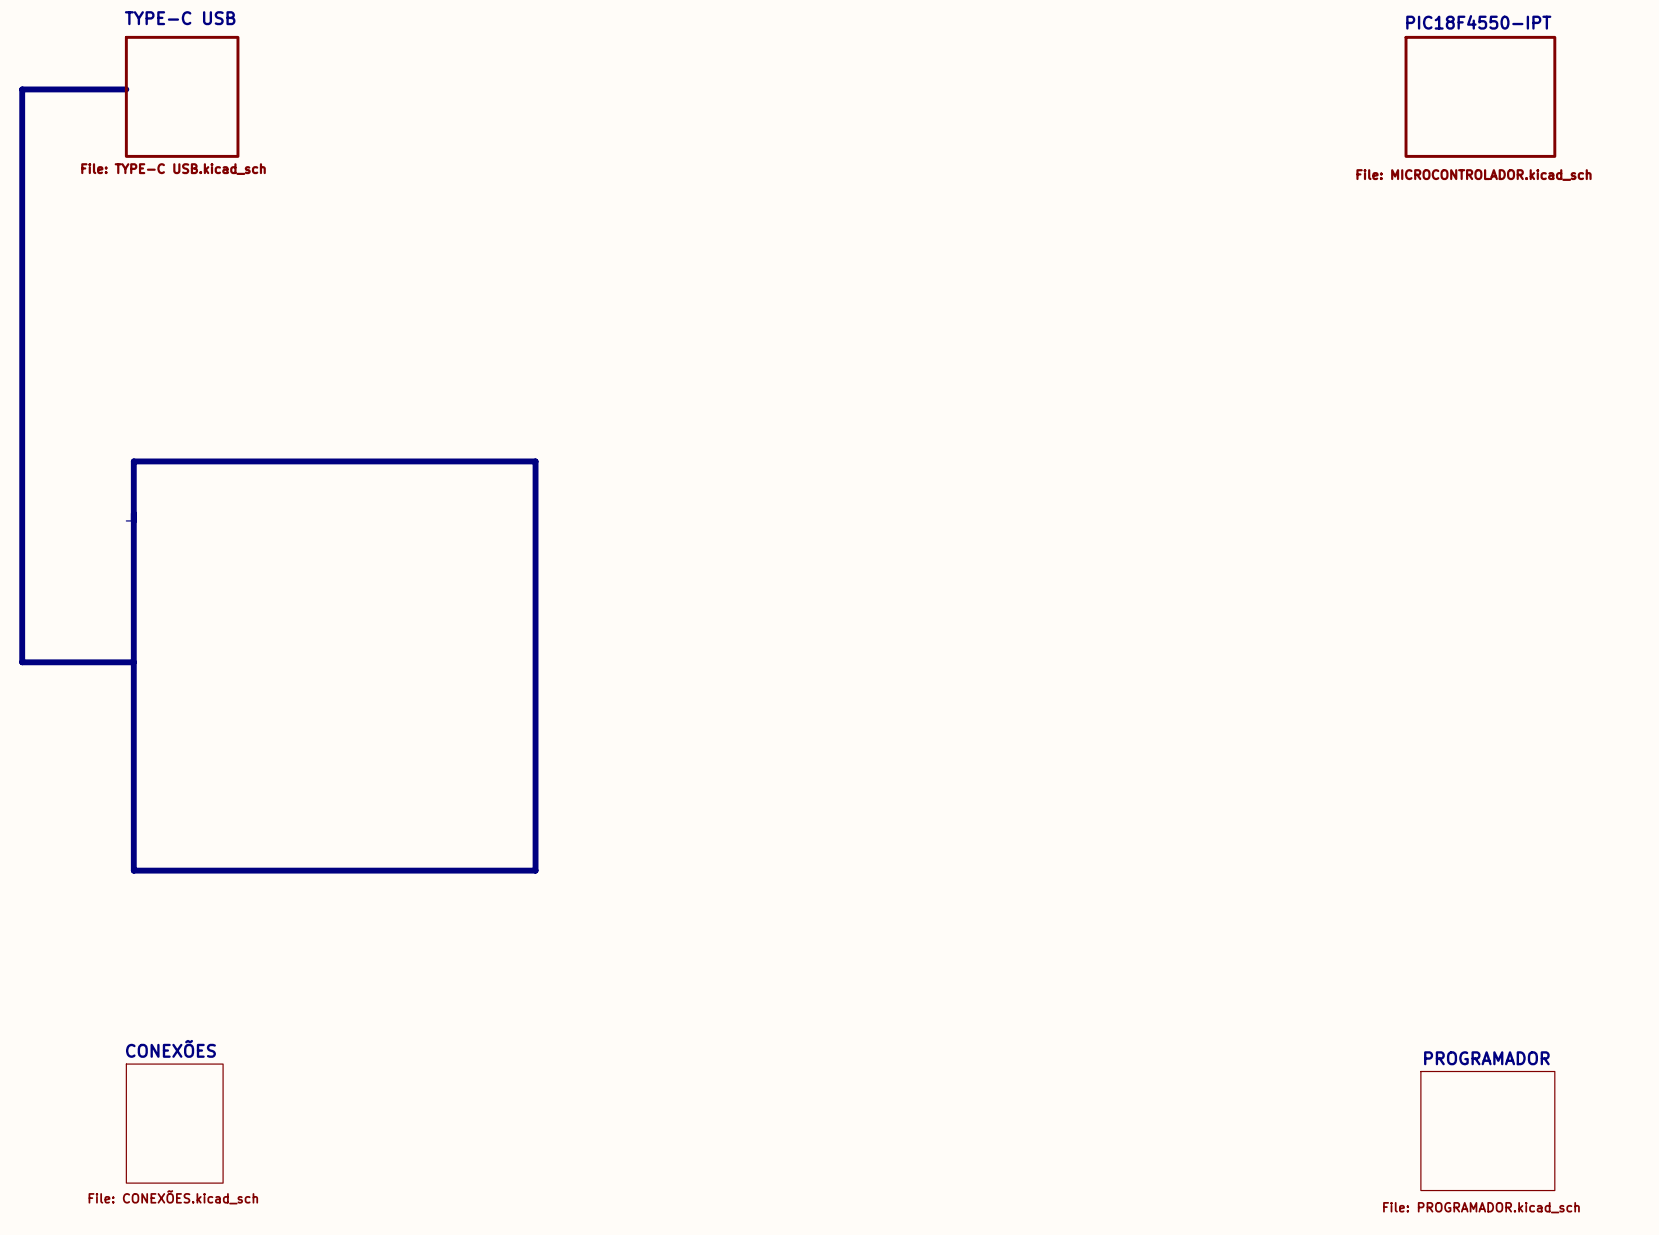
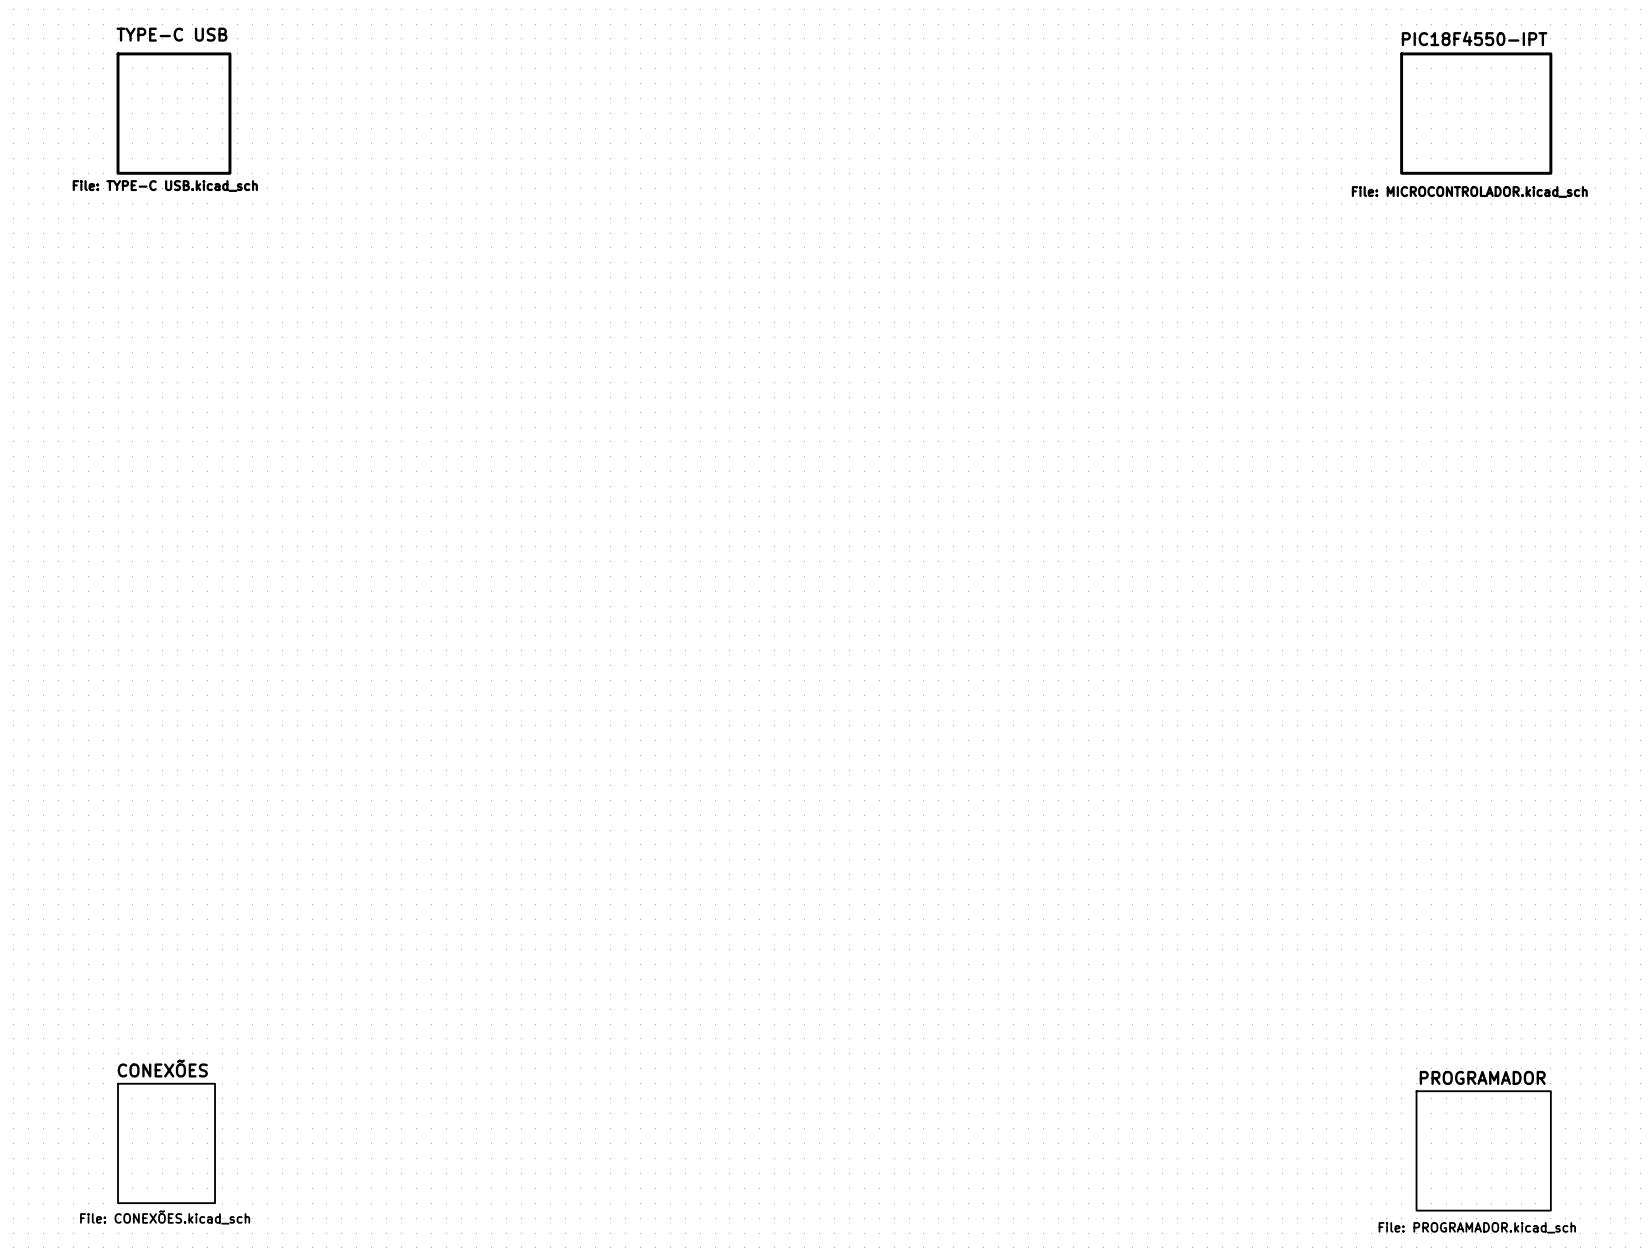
line: (126, 89) (22, 89) (22, 662) (133, 662) -> none
line: (133, 461) (133, 870) (535, 870) (535, 461) (133, 461) -> none
line: (126, 520) (133, 520) -> none

